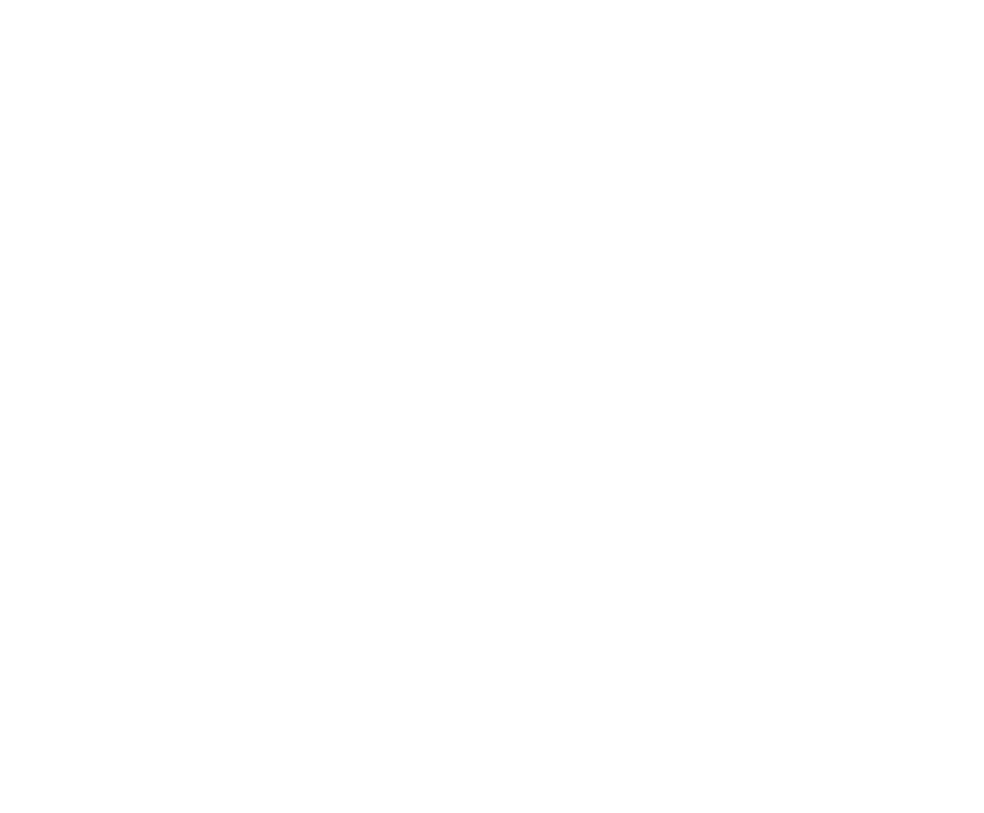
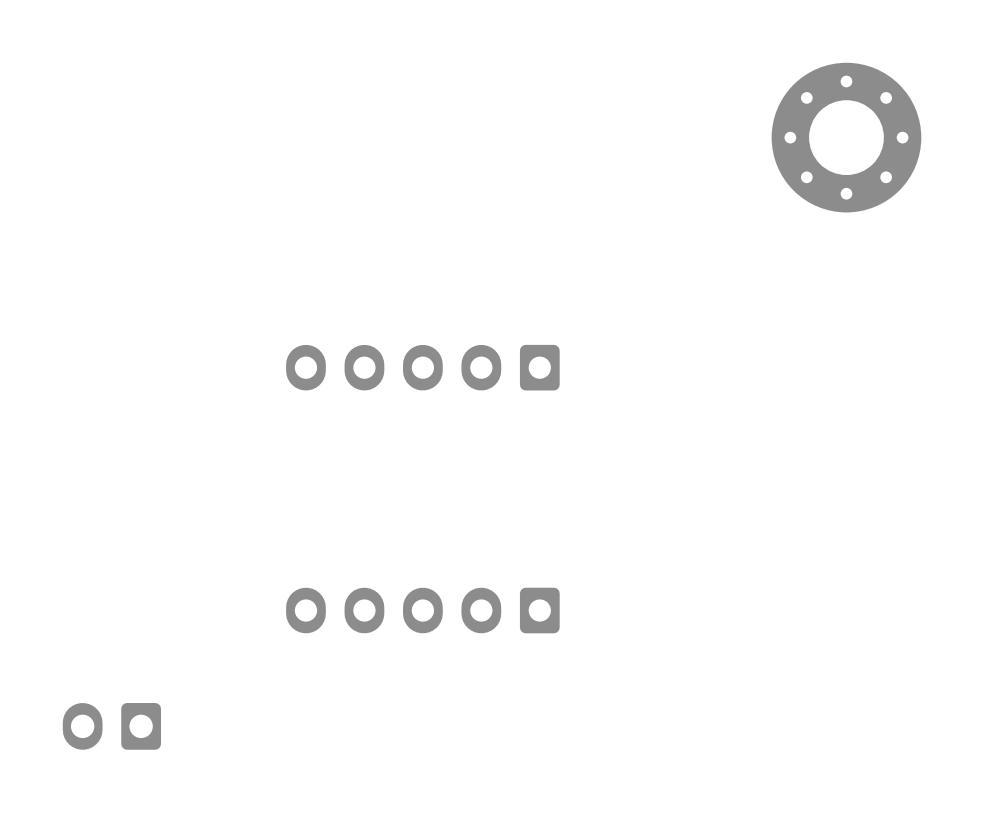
part: none -> (846, 137)
part: none -> (422, 367)
part: none -> (422, 610)
part: none -> (111, 726)

